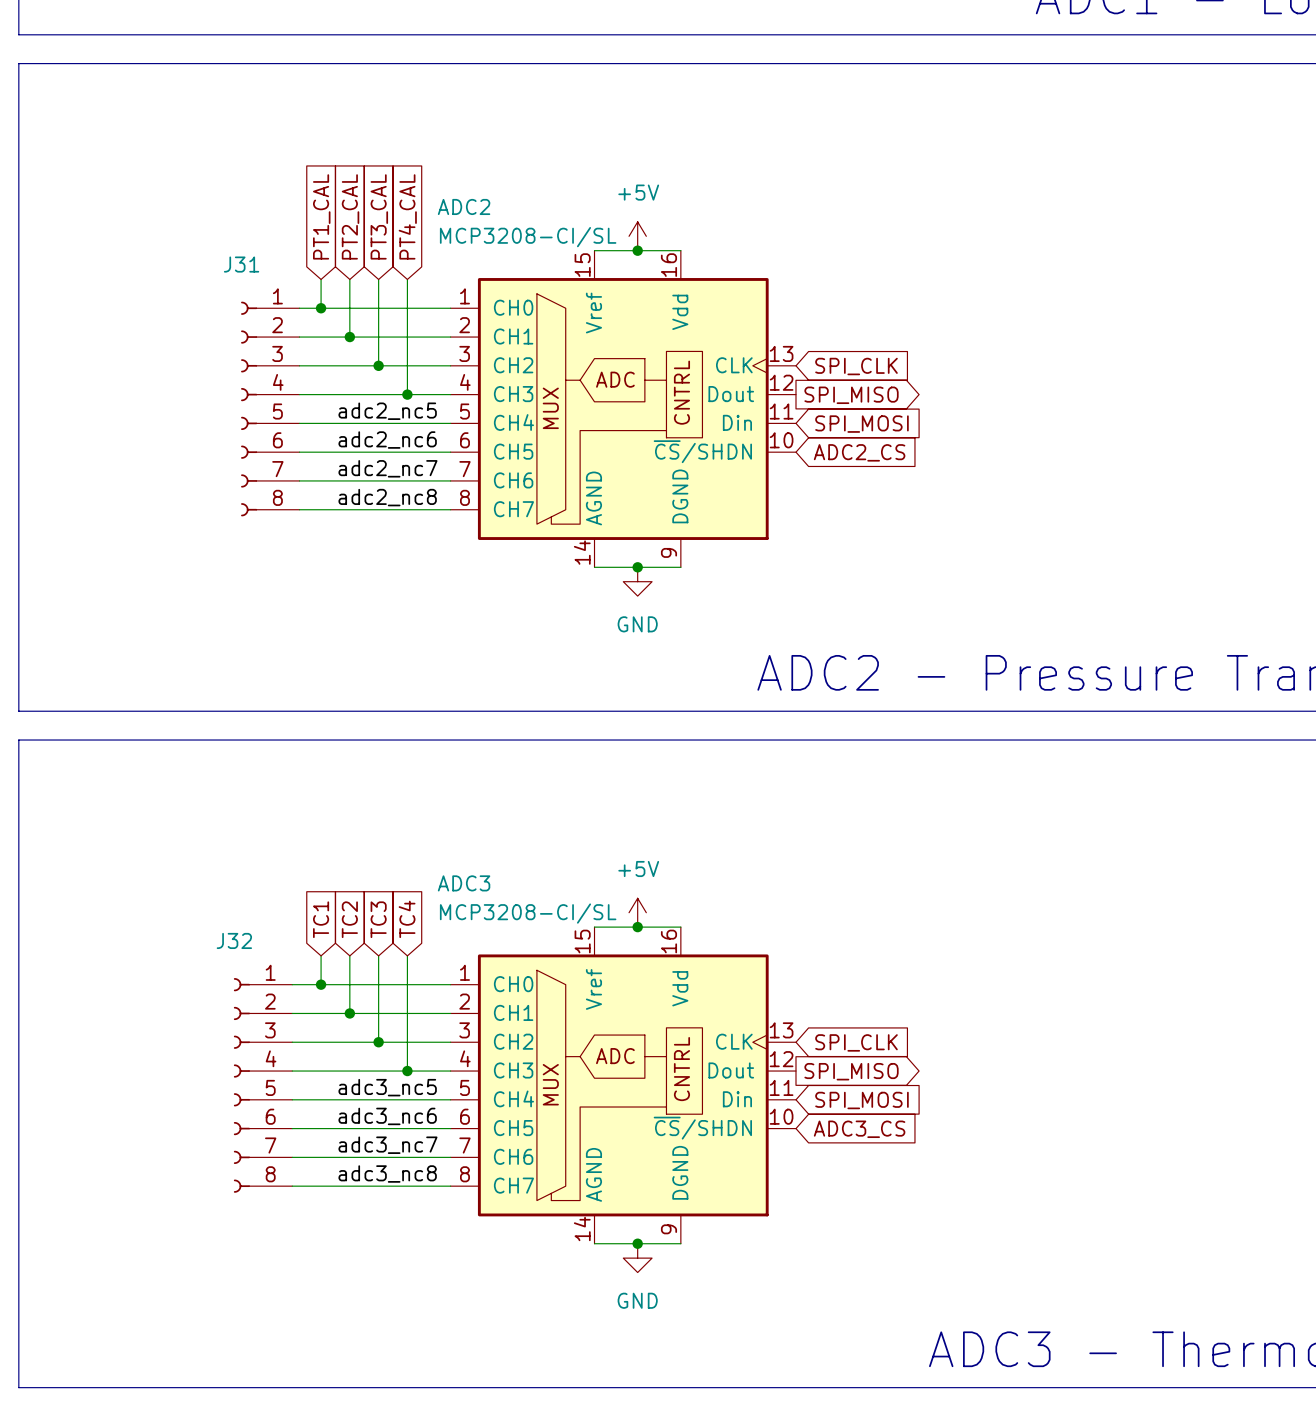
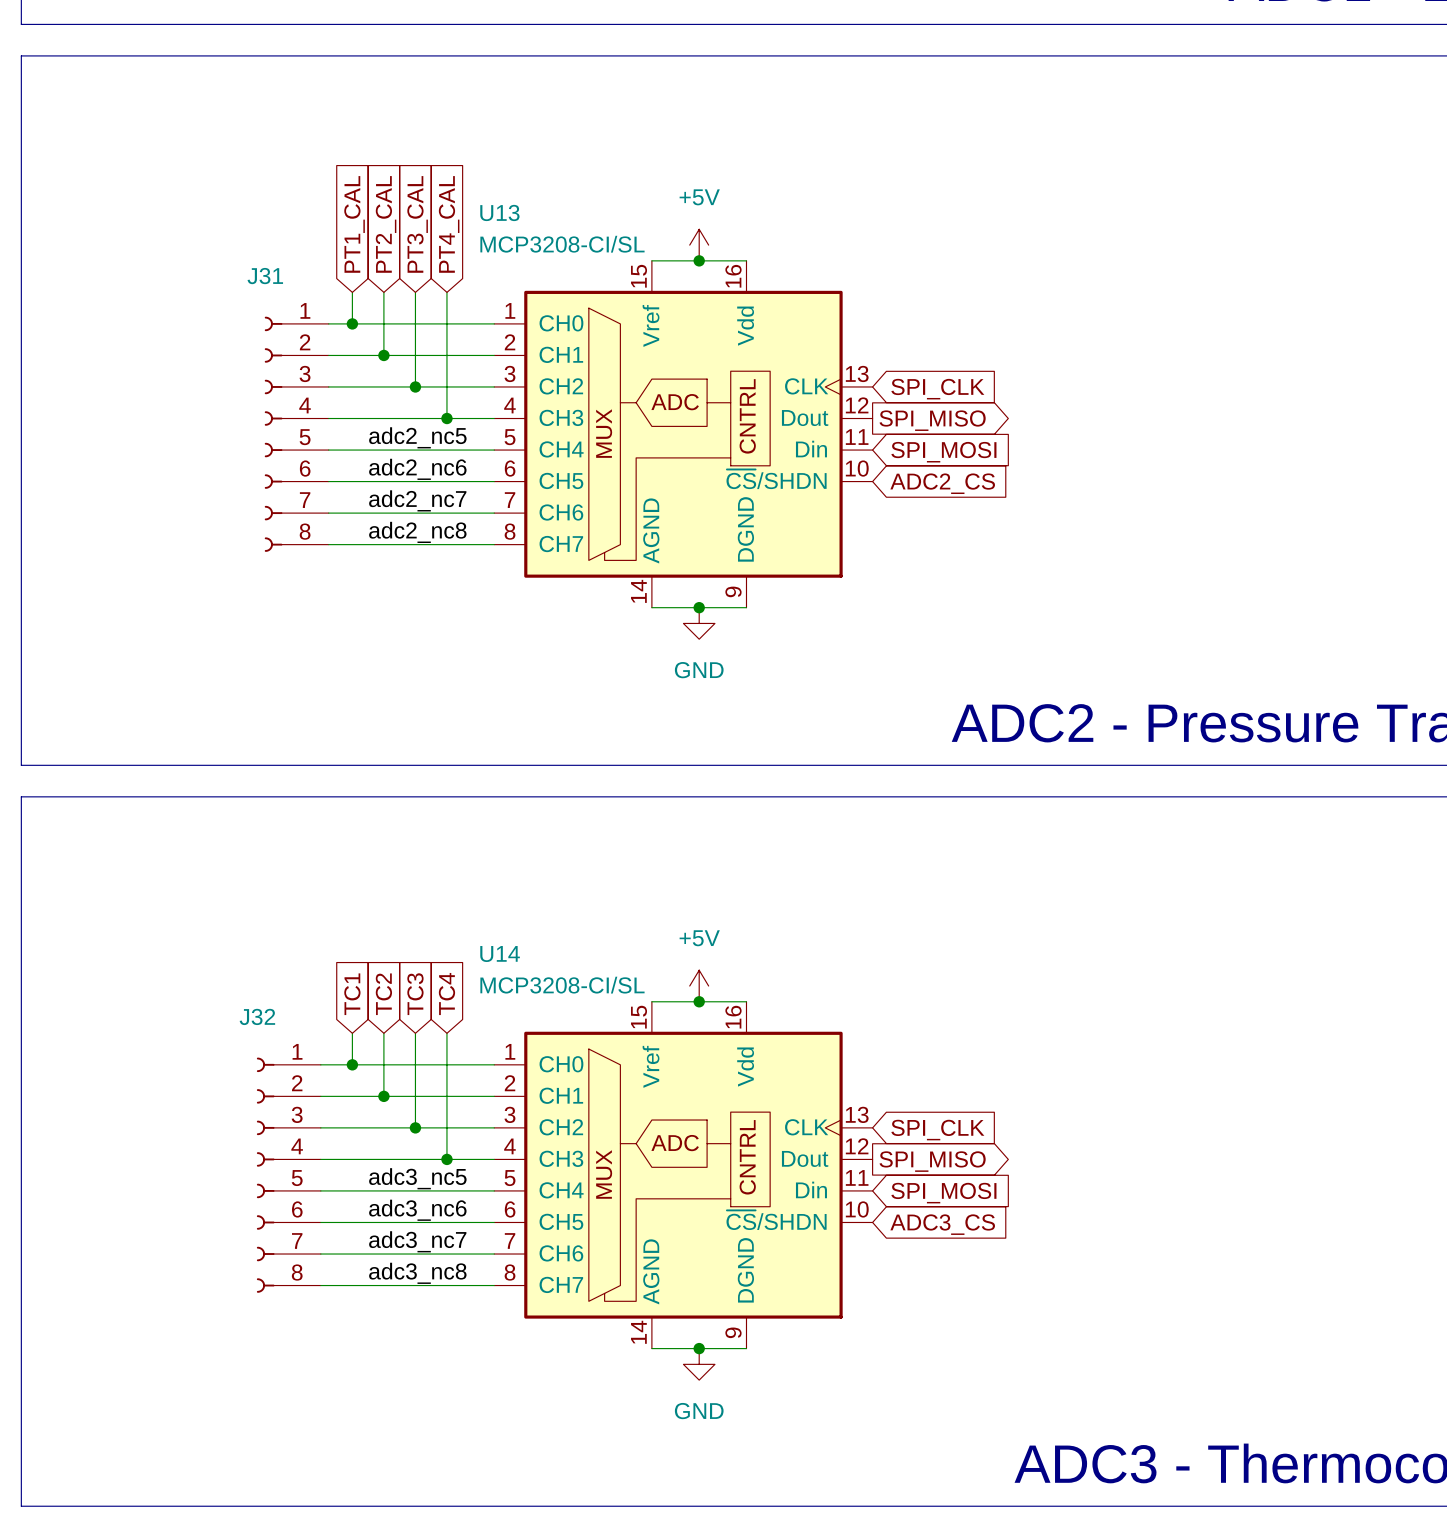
ADC2 name: ADC2 (464, 206) -> U13 (499, 212)
ADC3 name: ADC3 (464, 883) -> U14 (500, 954)

